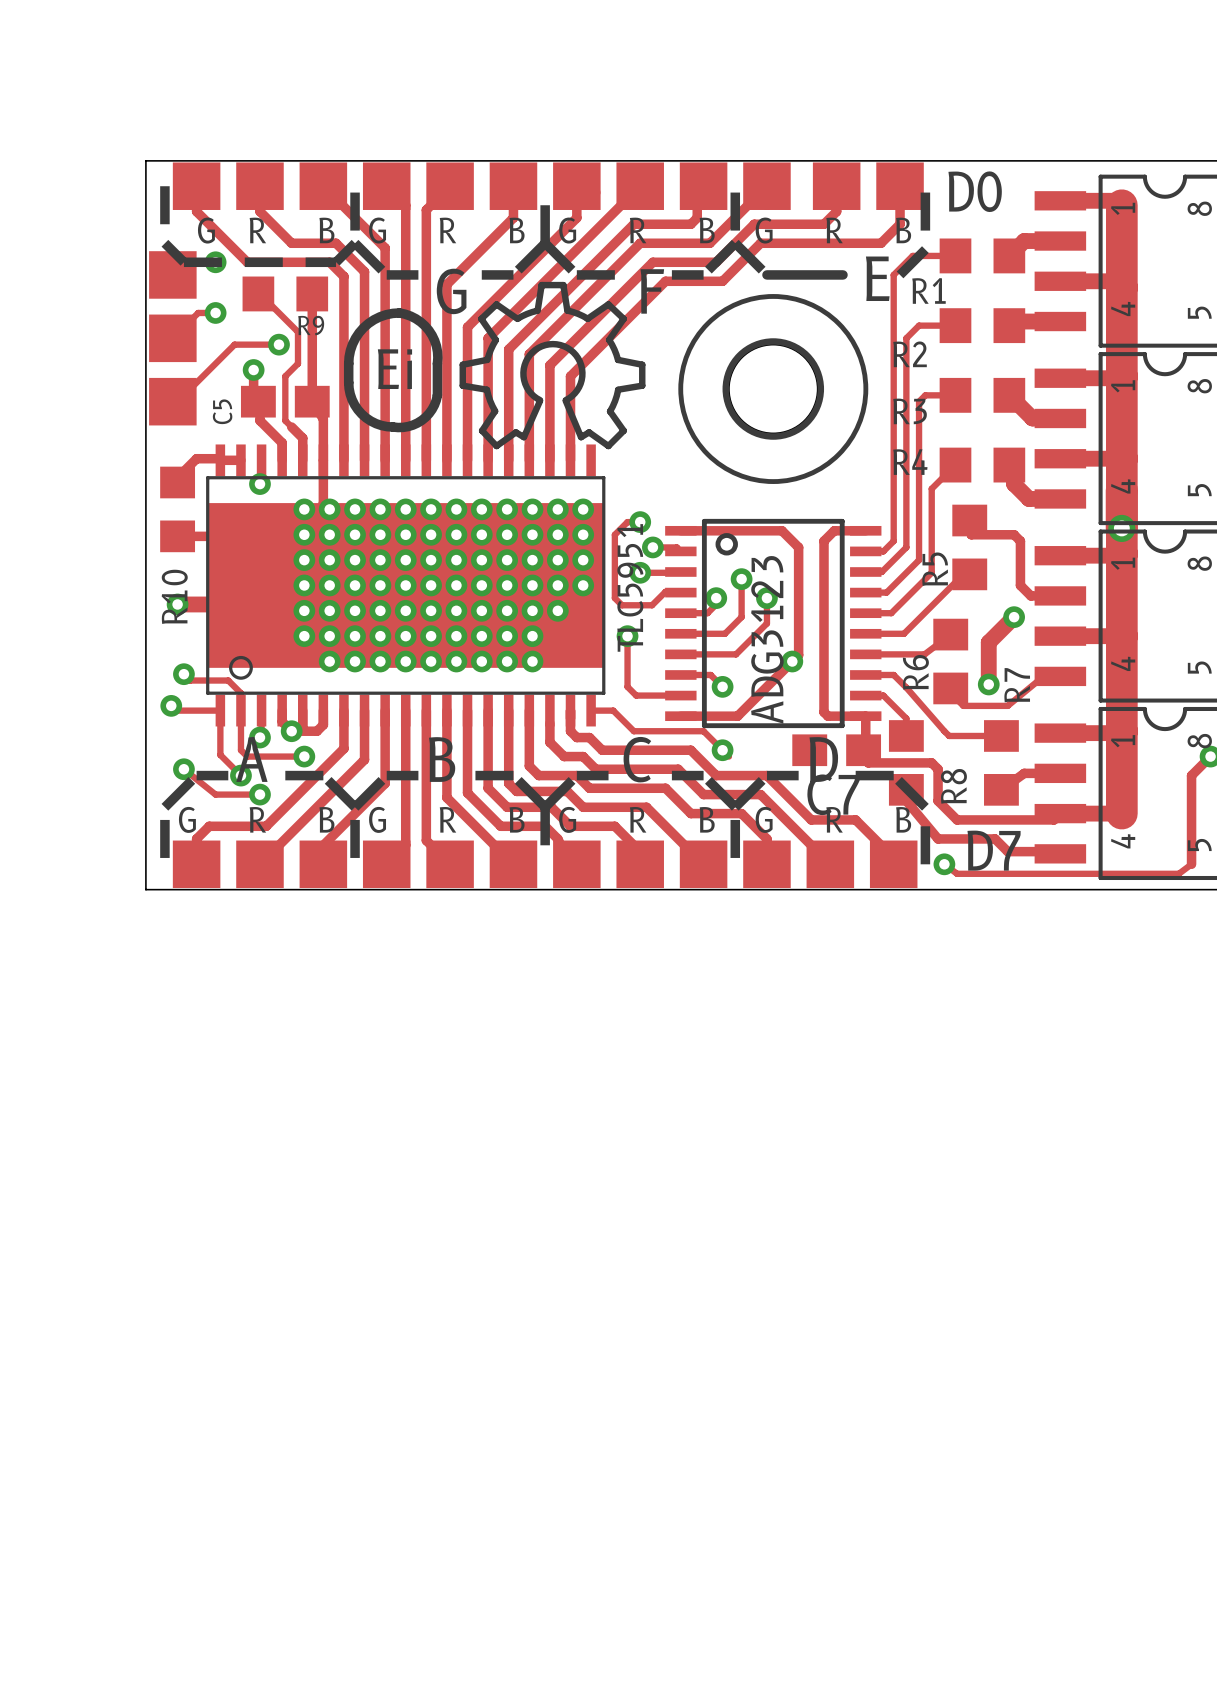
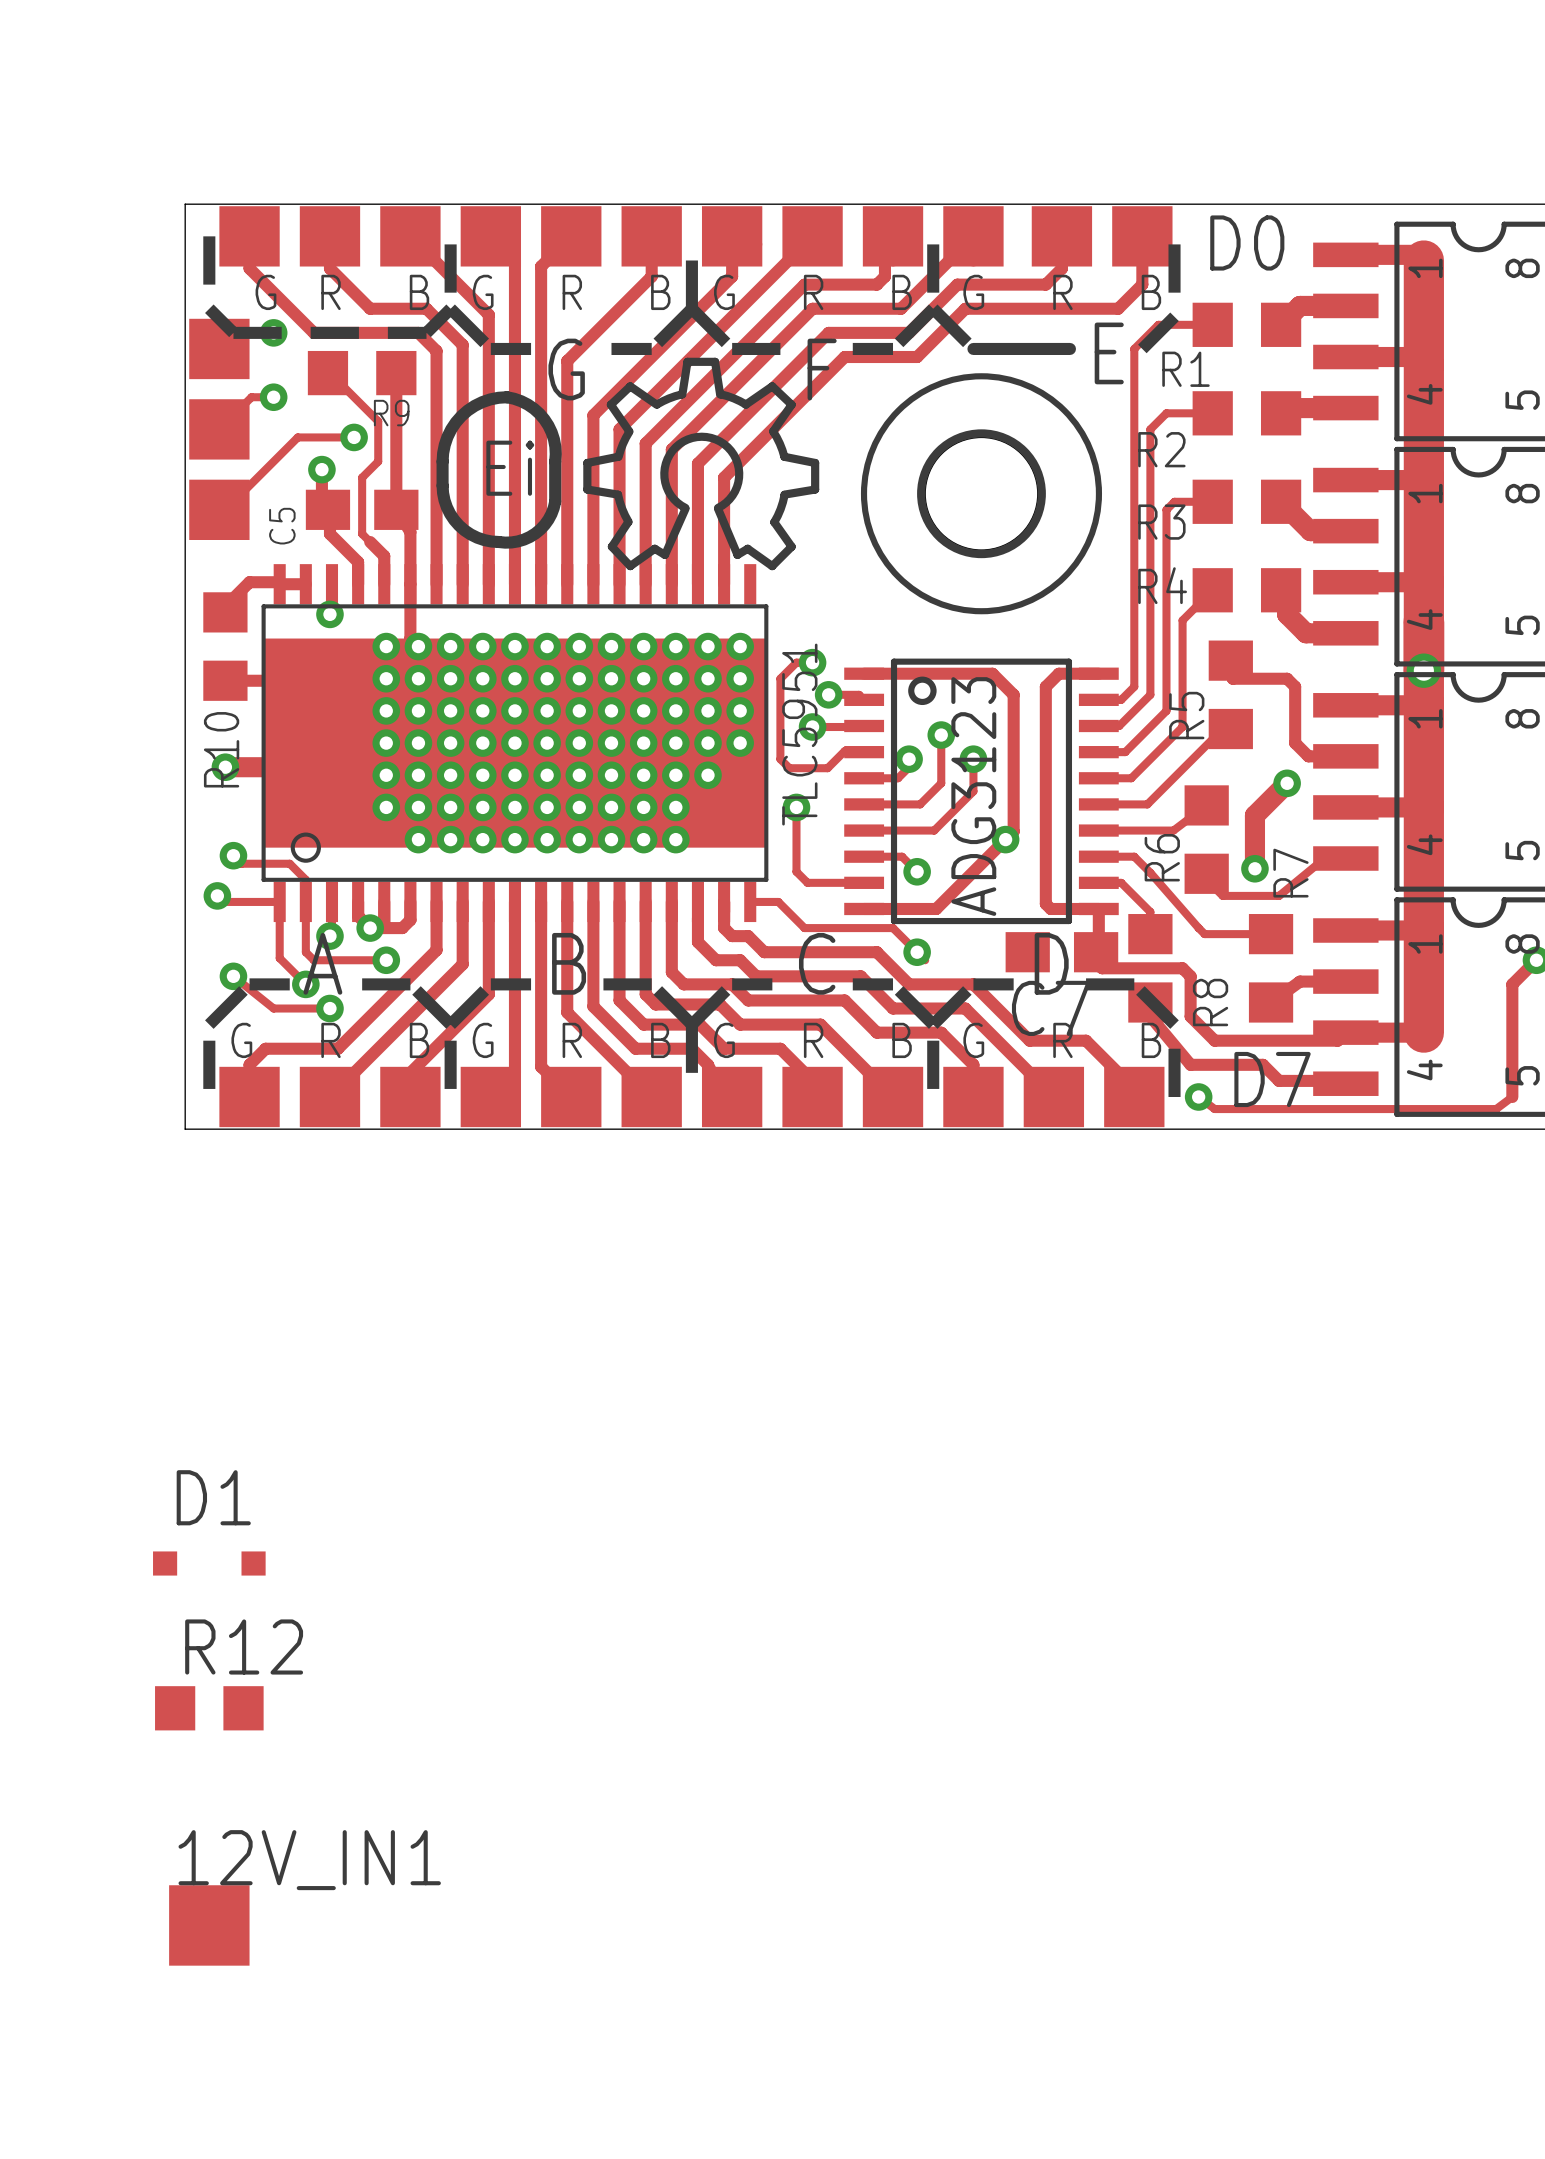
D1: none -> (209, 1563)
R12: none -> (209, 1708)
12V_IN1: none -> (209, 1925)

